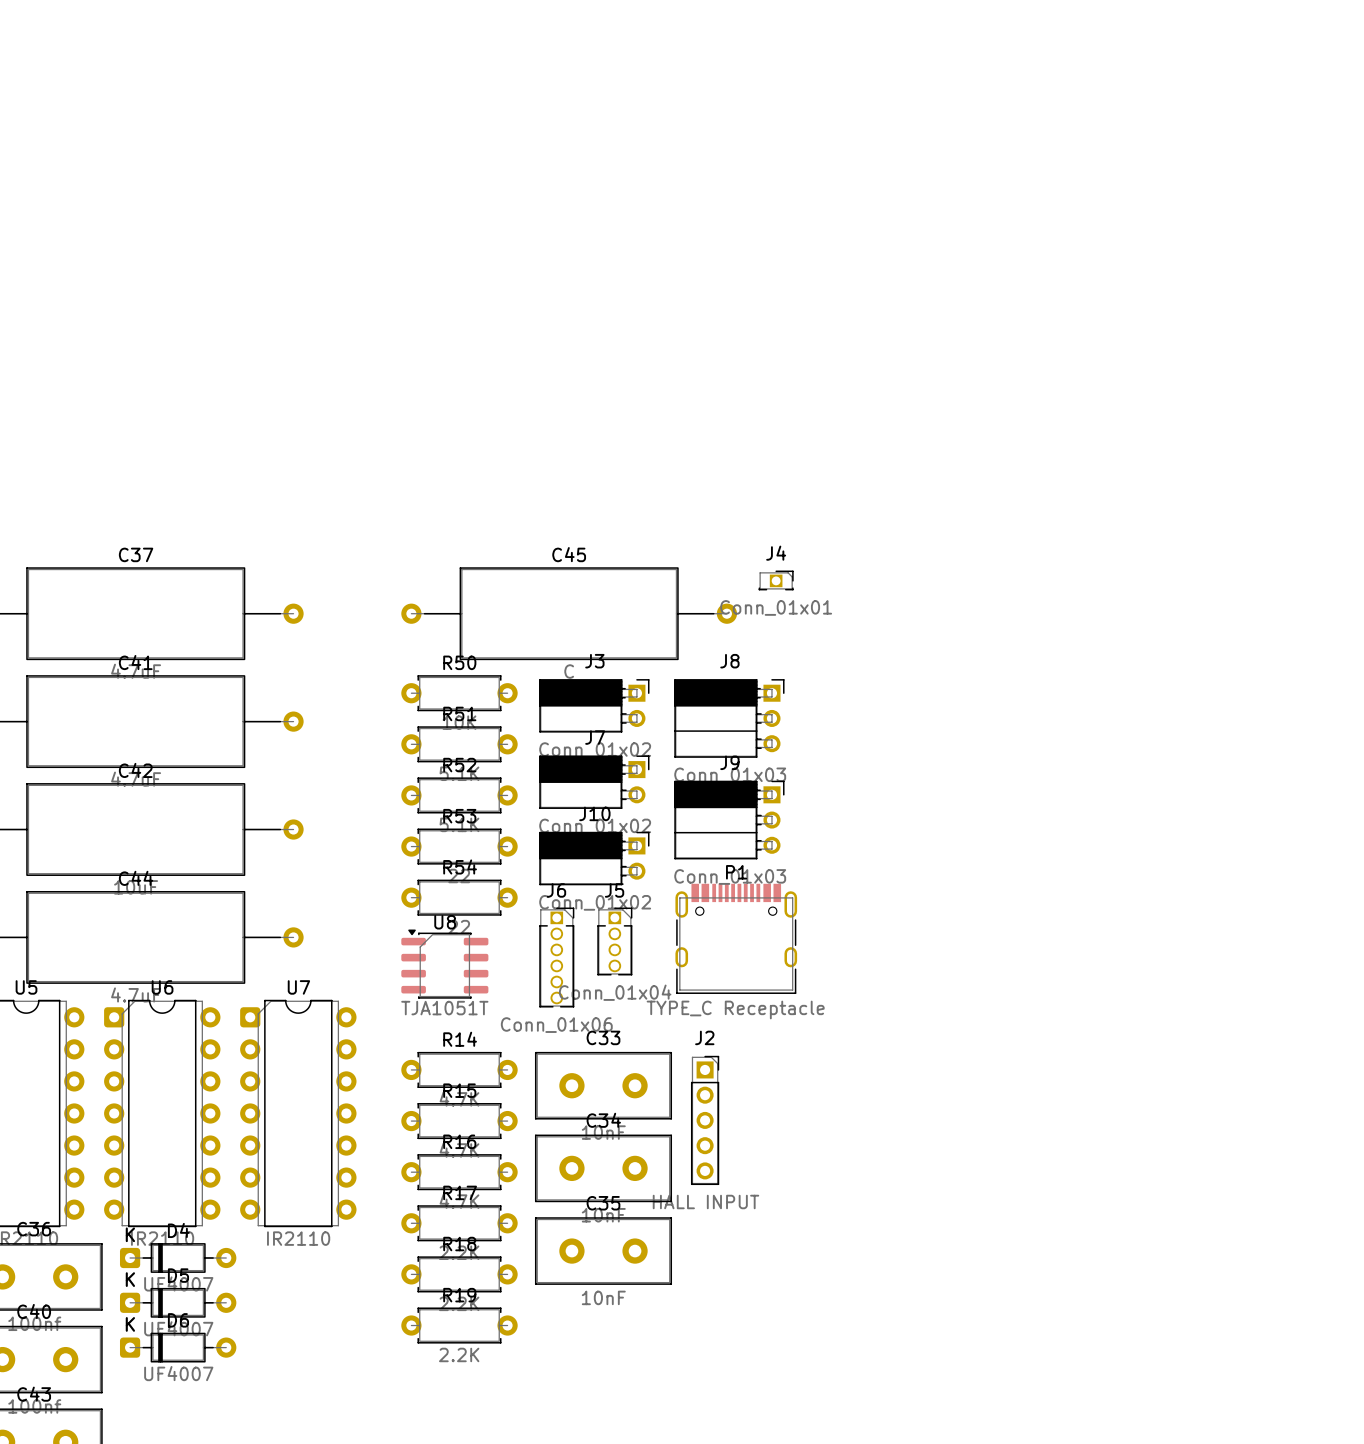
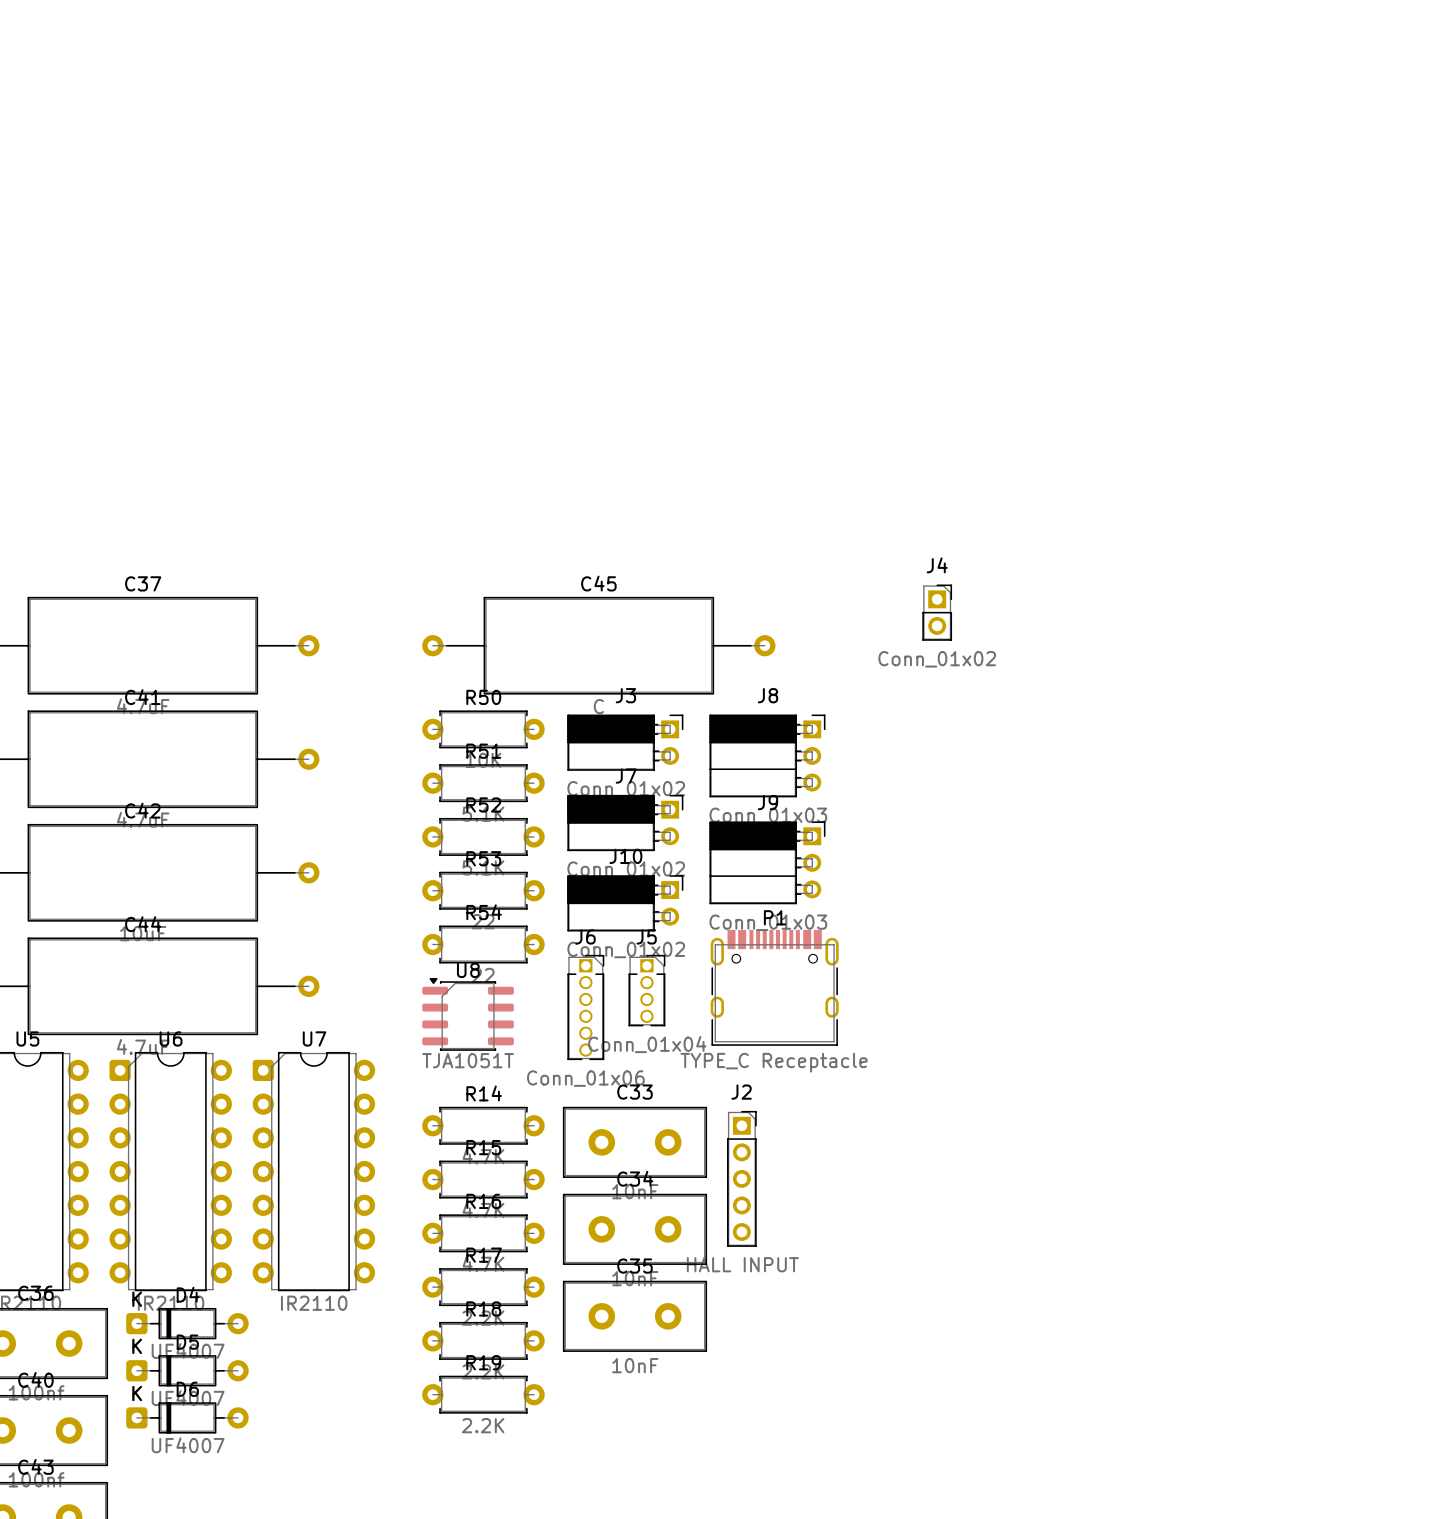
J4 footprint: [758, 570, 794, 591] -> [922, 584, 953, 641]
J4 value: Conn_01x01 (776, 607) -> Conn_01x02 (937, 659)

